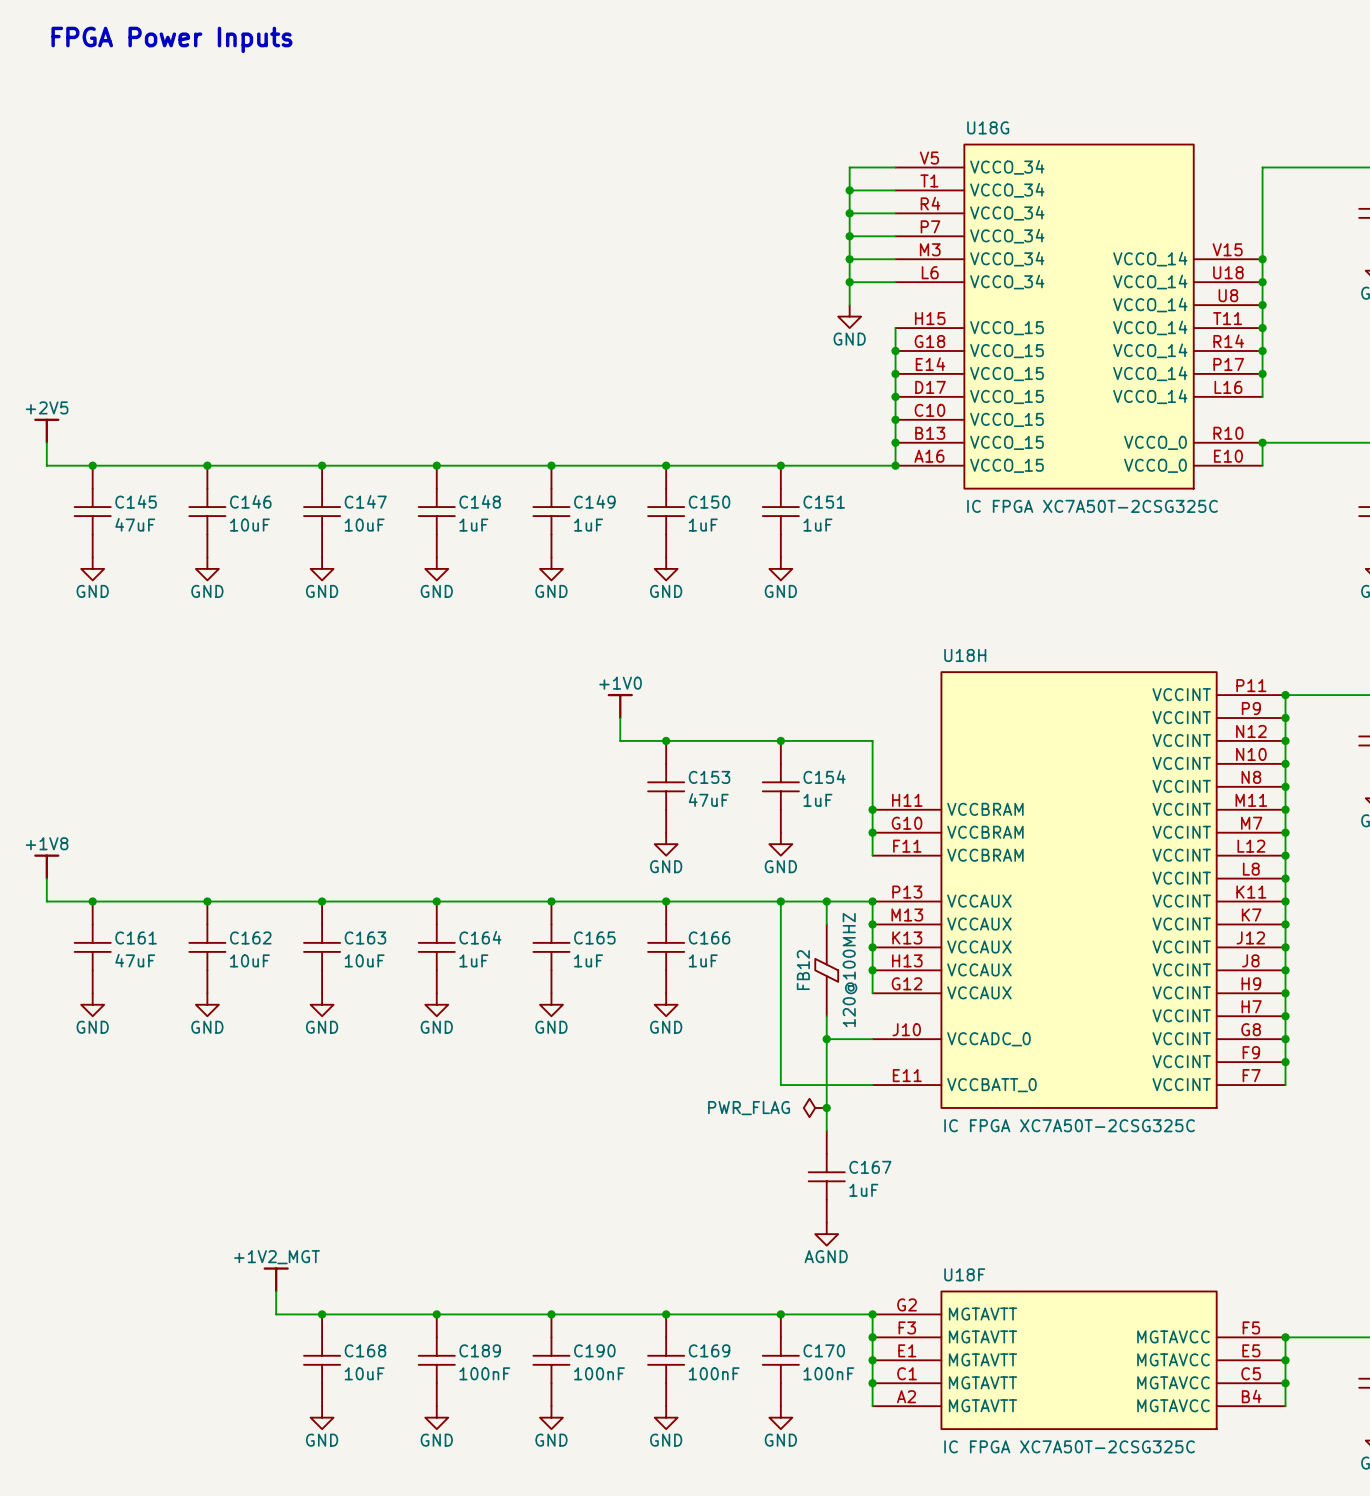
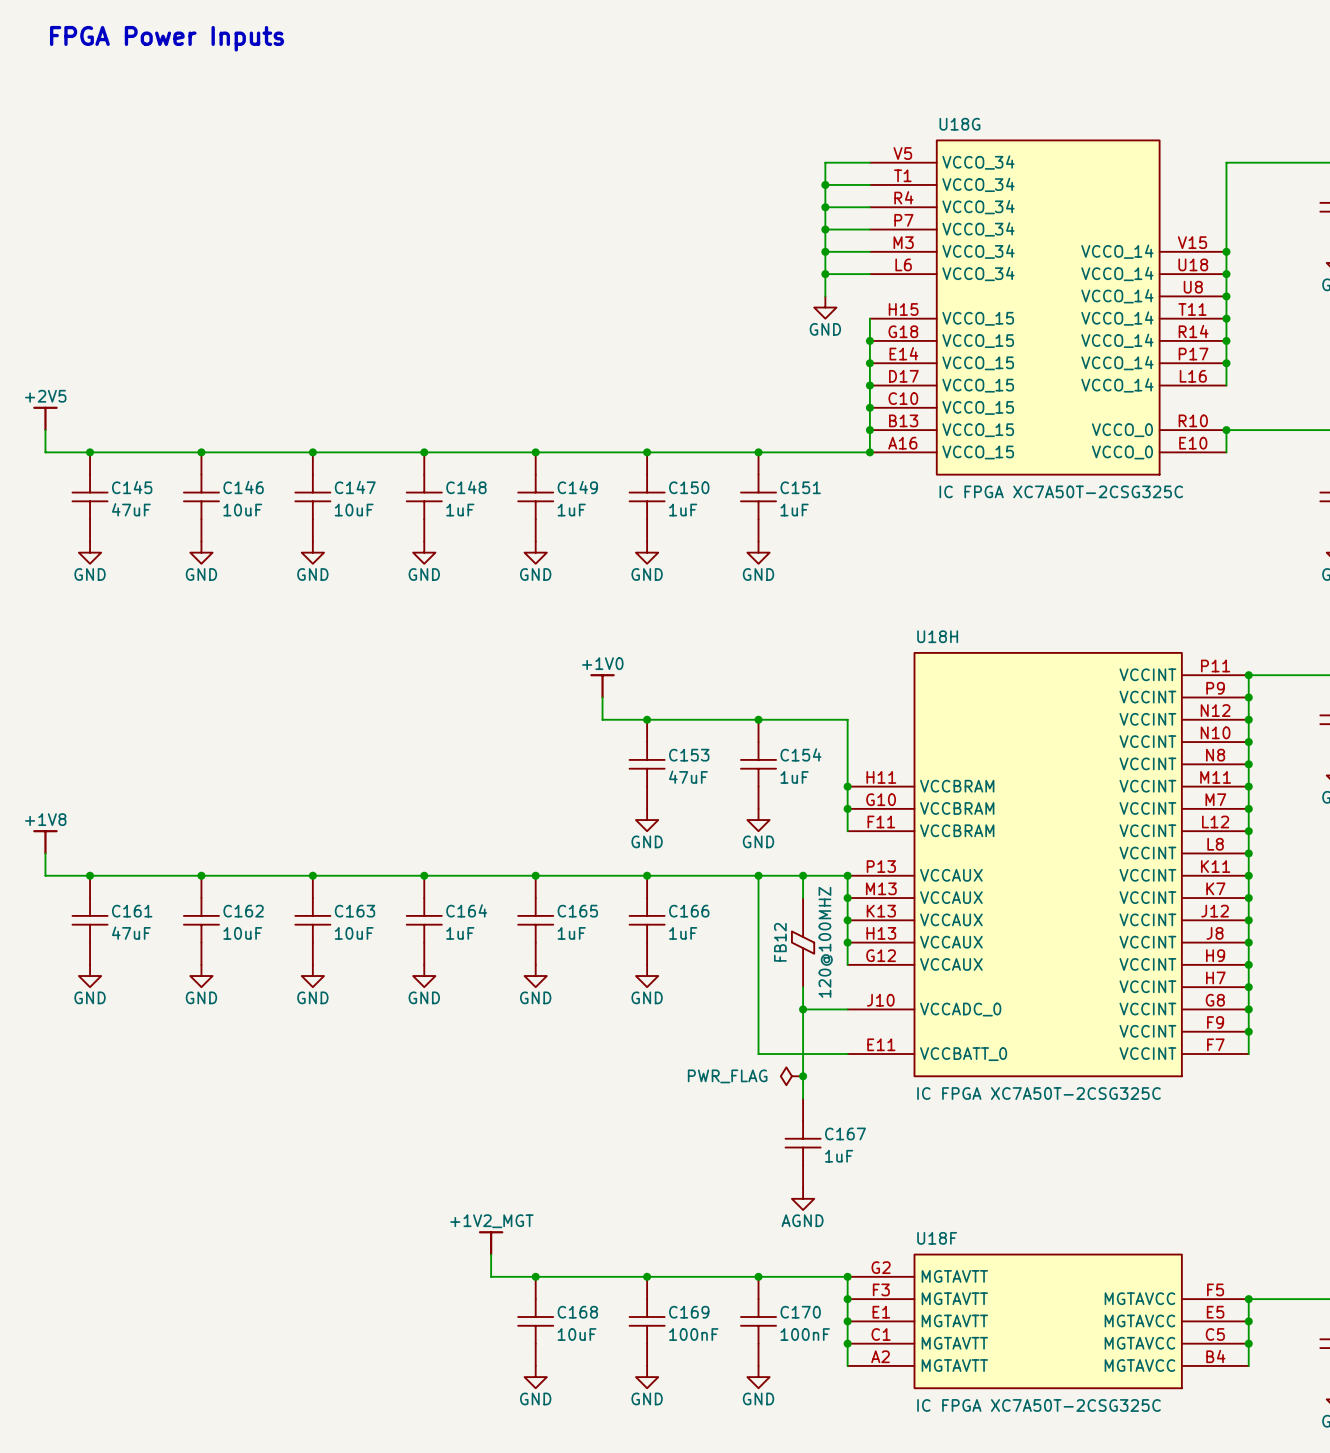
power symbol: +1V2_MGT (276, 1280) -> none
power symbol: none -> +1V2_MGT (491, 1243)
wire: (276, 1291) (276, 1314) (505, 1314) -> (491, 1254) (491, 1276)
junction: (322, 1314) -> none
junction: (436, 1314) -> none
C190 name: C190 (594, 1350) -> C168 (577, 1312)
C168: 10uF (322, 1360) -> none
C189: 100nF (436, 1360) -> none
C190 value: 100nF (599, 1373) -> 10uF (577, 1334)
power symbol: GND (322, 1417) -> none
power symbol: GND (436, 1417) -> none

